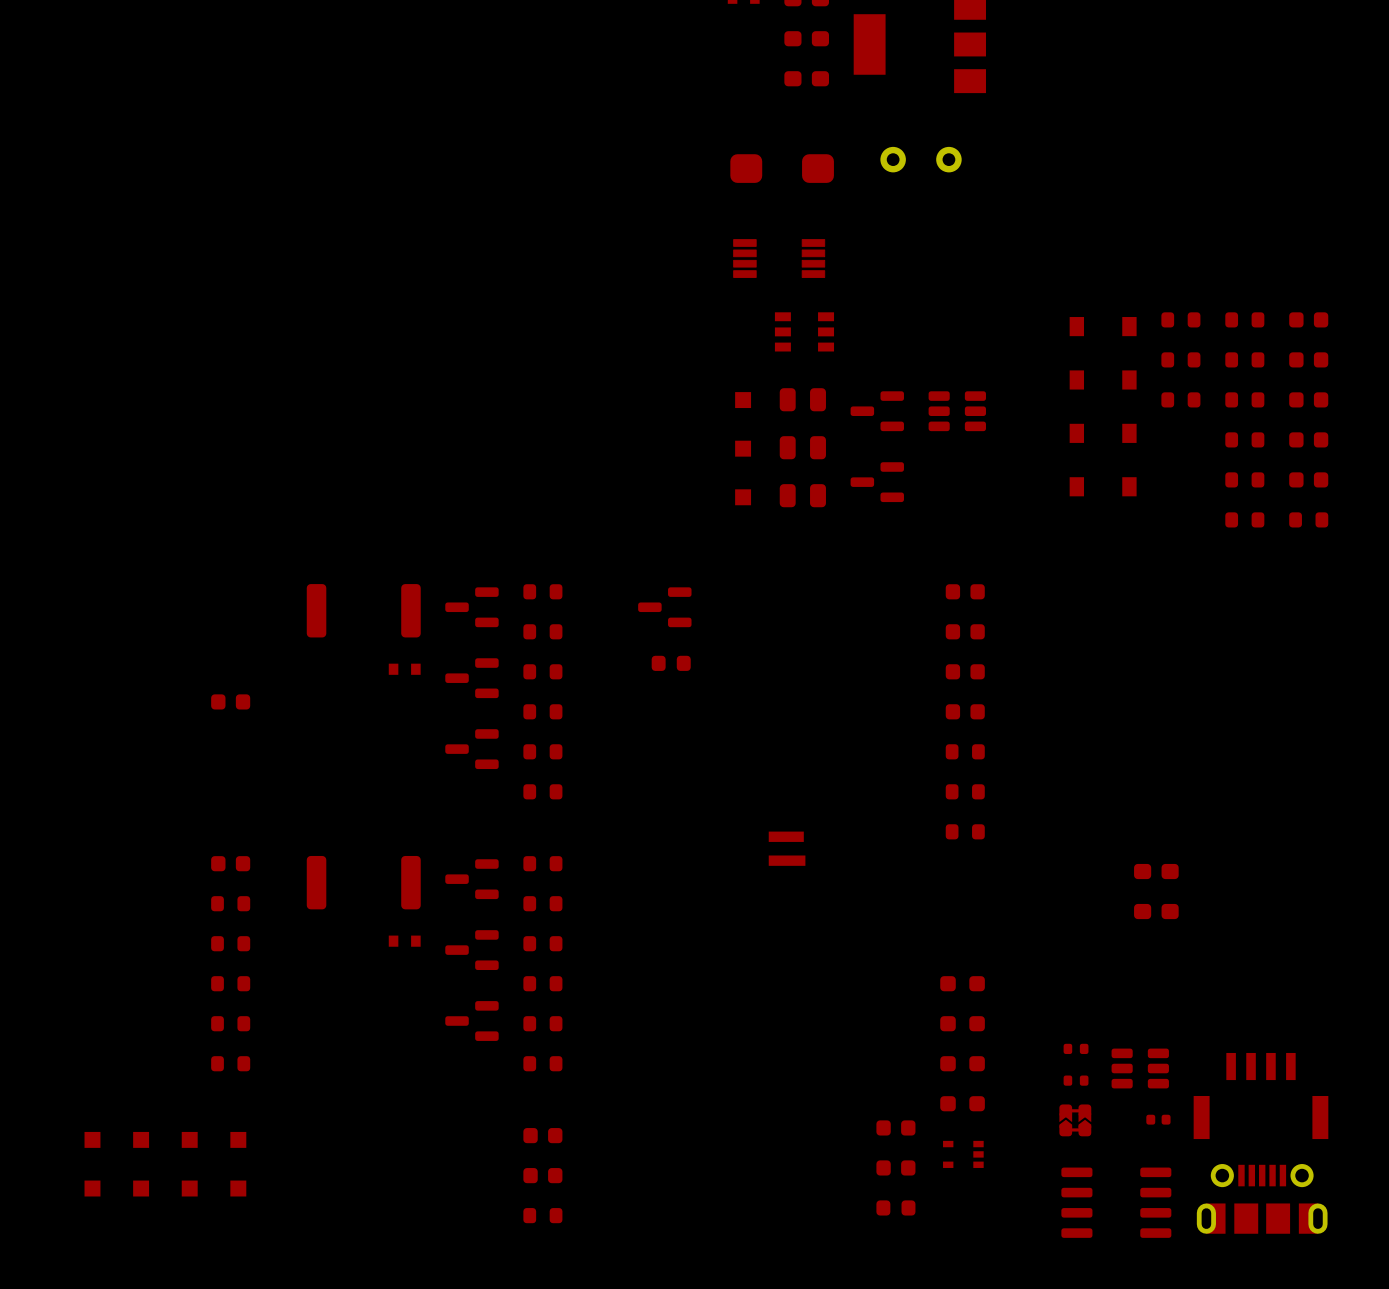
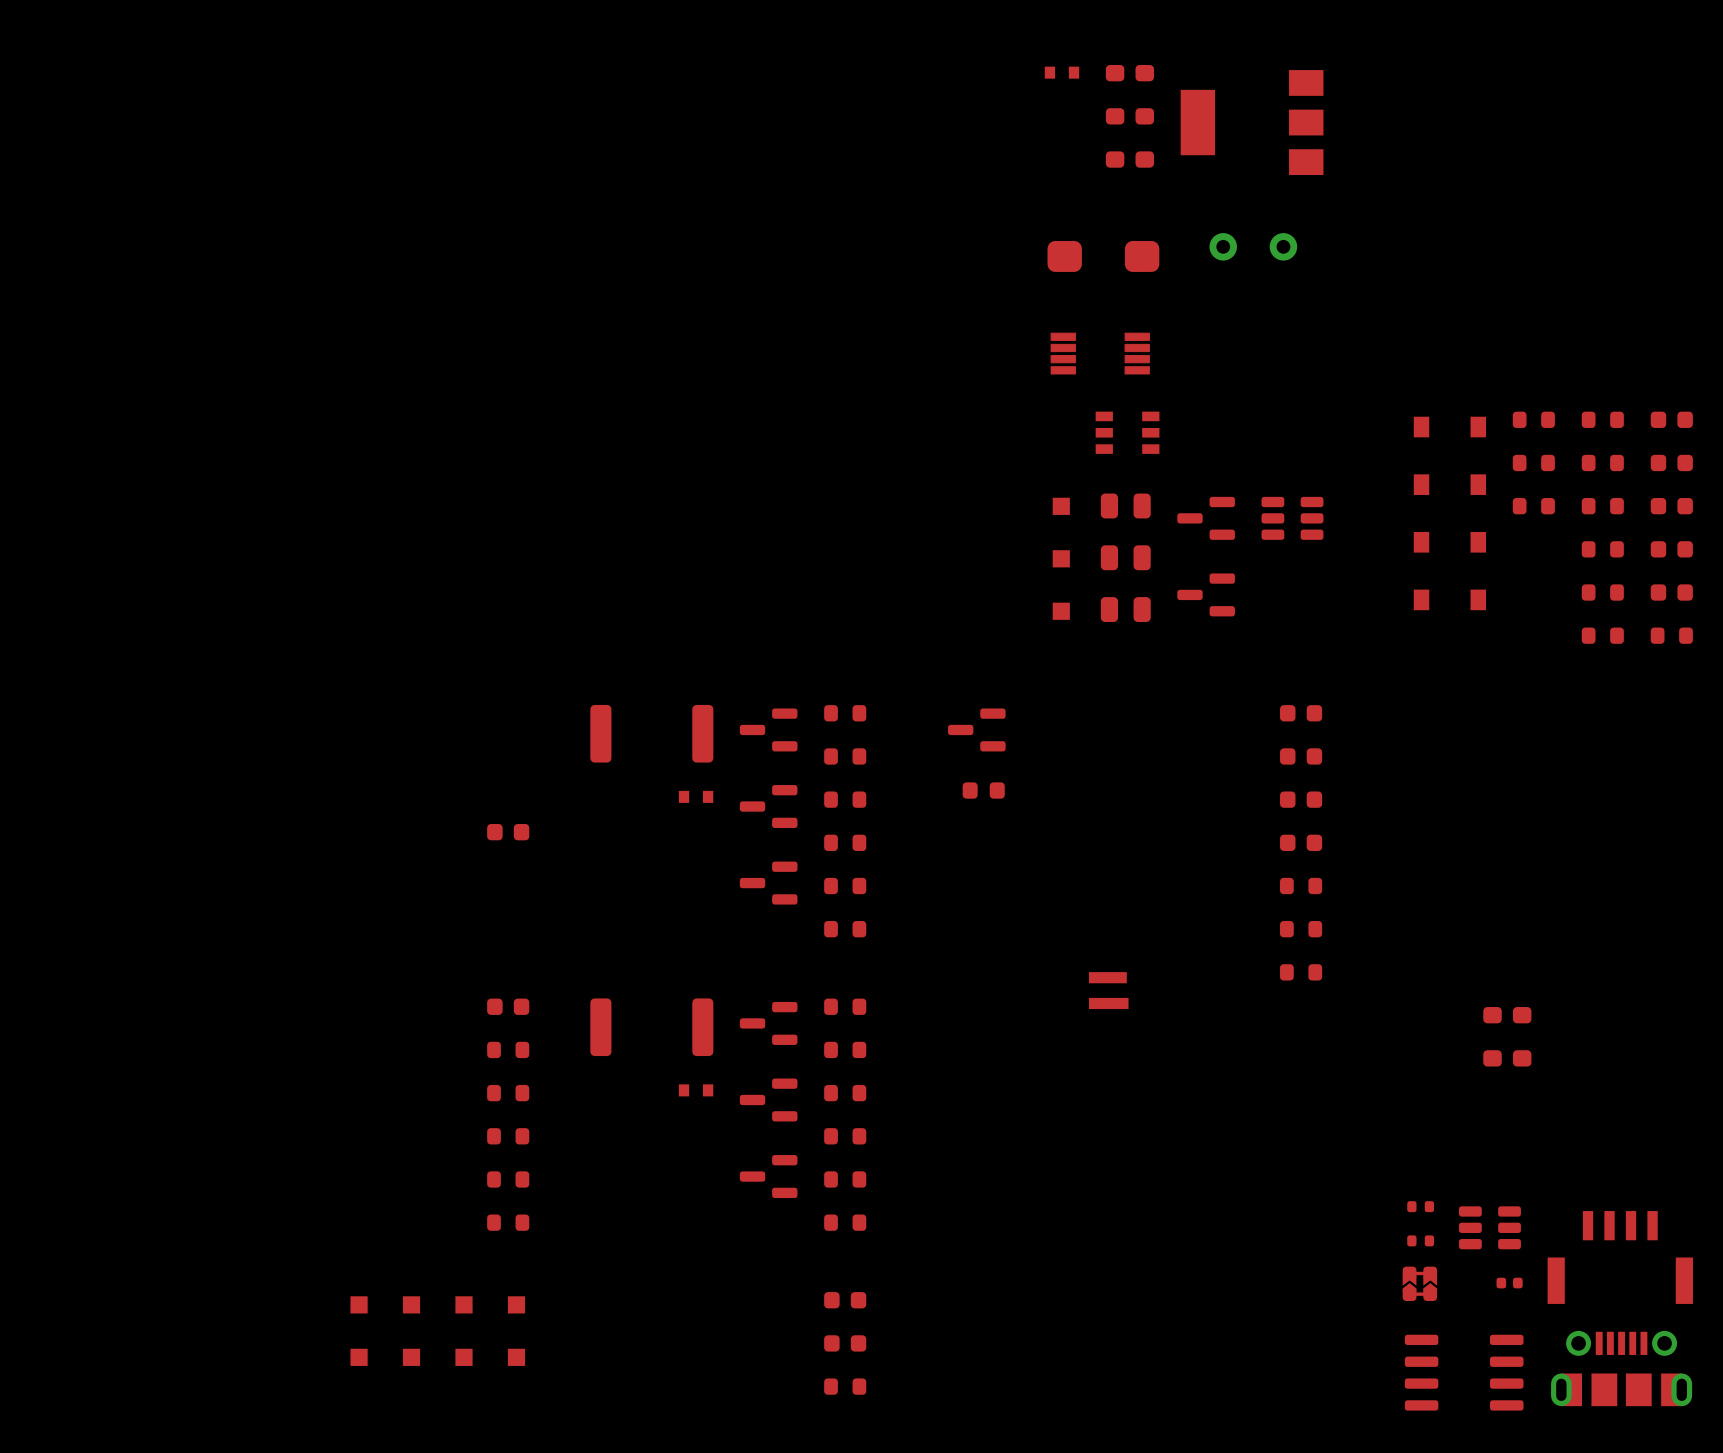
part: (962, 983) -> none
part: (962, 1023) -> none
part: (962, 1063) -> none
part: (962, 1103) -> none
part: (895, 1127) -> none
part: (963, 1154) -> none
part: (895, 1167) -> none
part: (895, 1207) -> none

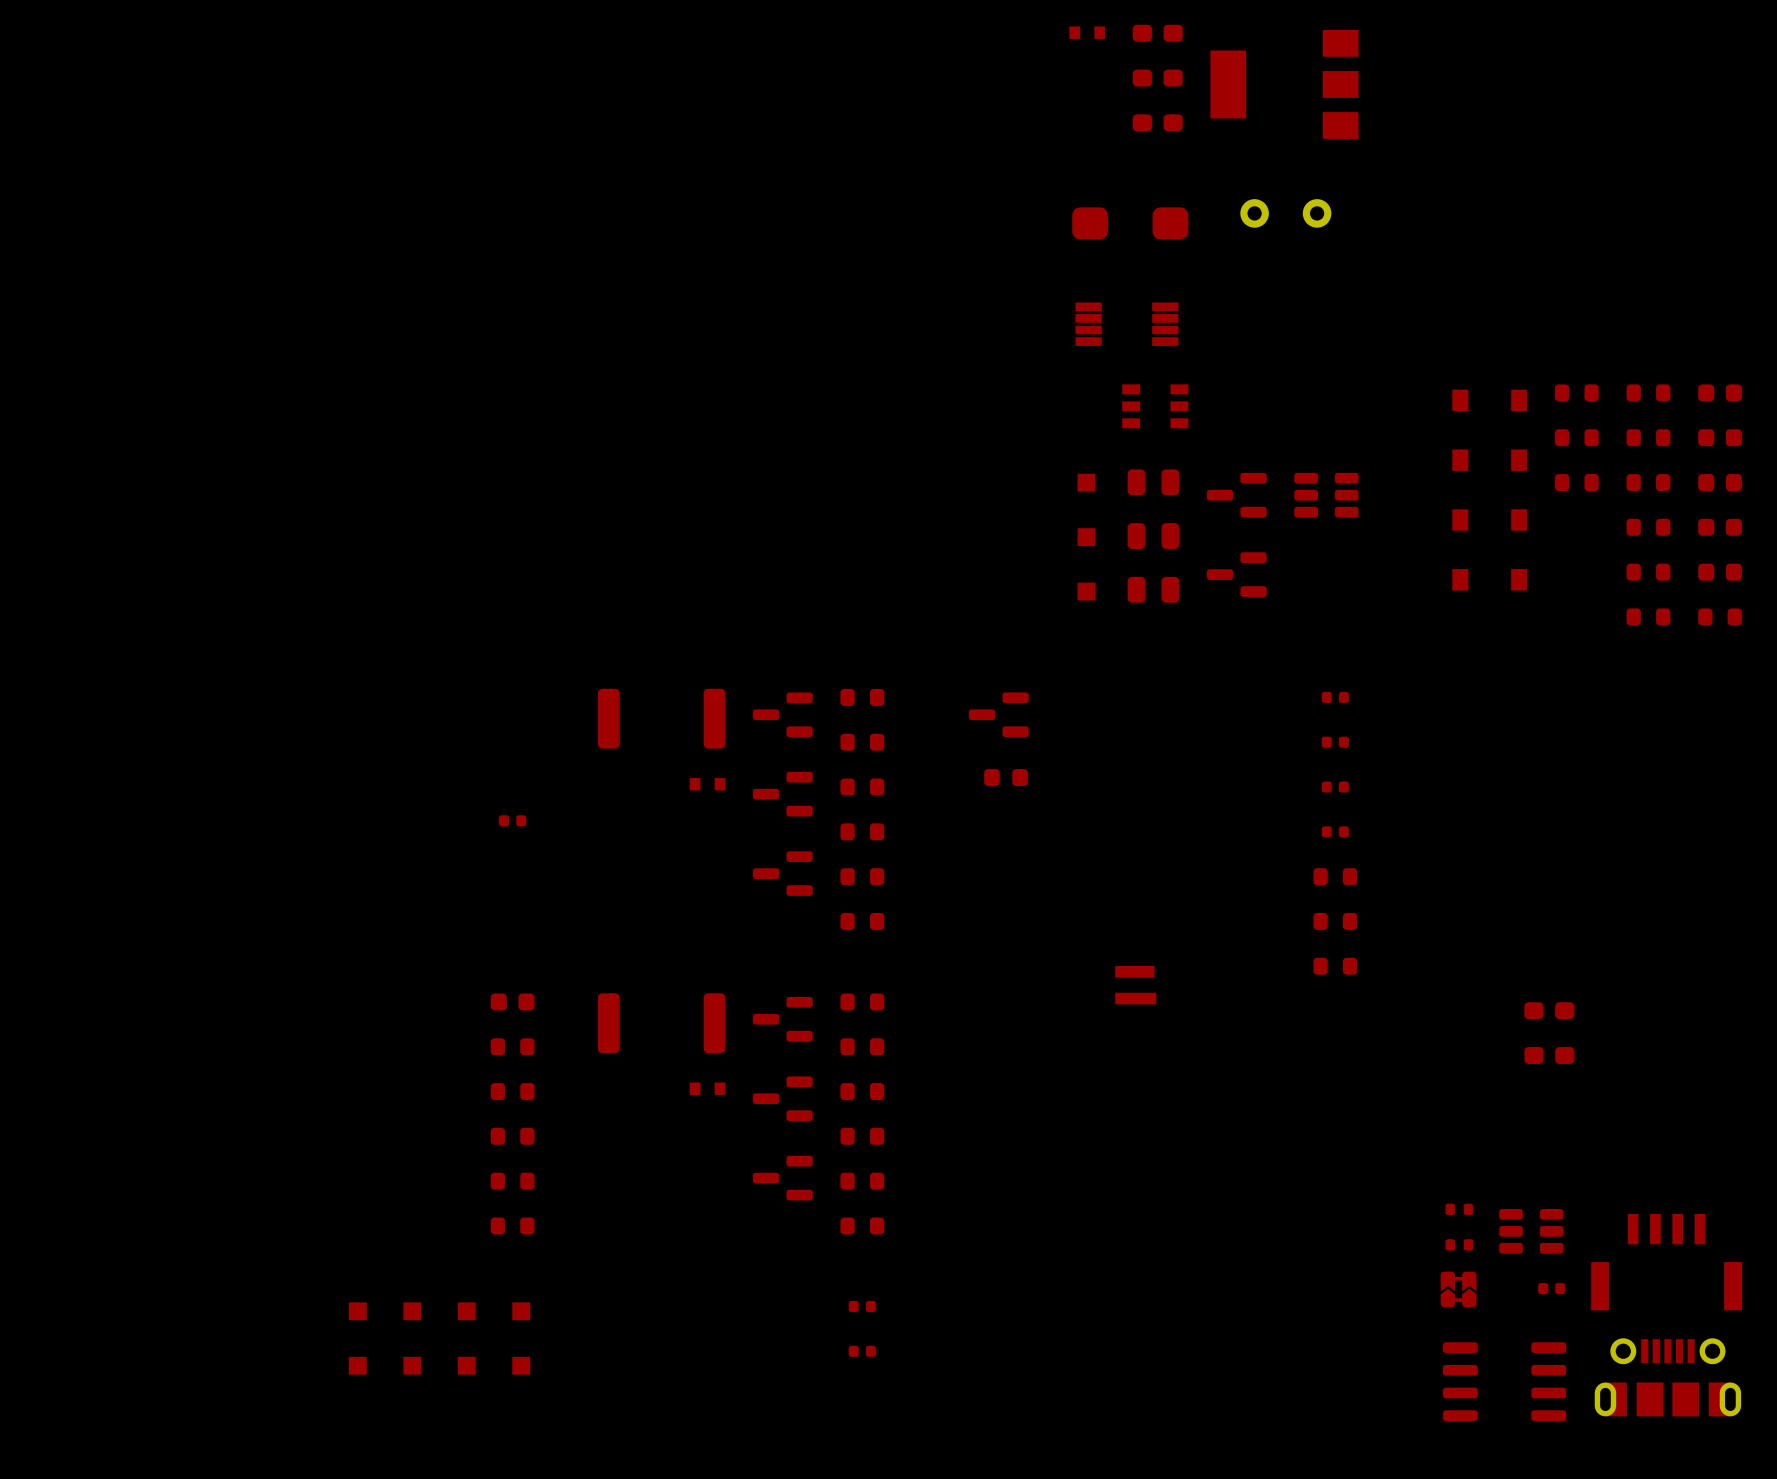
part footprint: [1280, 705, 1323, 722] -> [1321, 691, 1349, 703]
part footprint: [1280, 748, 1323, 765] -> [1321, 736, 1349, 748]
part footprint: [1280, 791, 1323, 808] -> [1321, 781, 1349, 793]
part footprint: [487, 823, 530, 841] -> [499, 815, 527, 827]
part footprint: [1280, 834, 1323, 851] -> [1321, 826, 1349, 838]
part footprint: [824, 1292, 867, 1309] -> [848, 1300, 876, 1313]
part footprint: [824, 1335, 867, 1352] -> [848, 1345, 876, 1357]
part: (845, 1386) -> none

